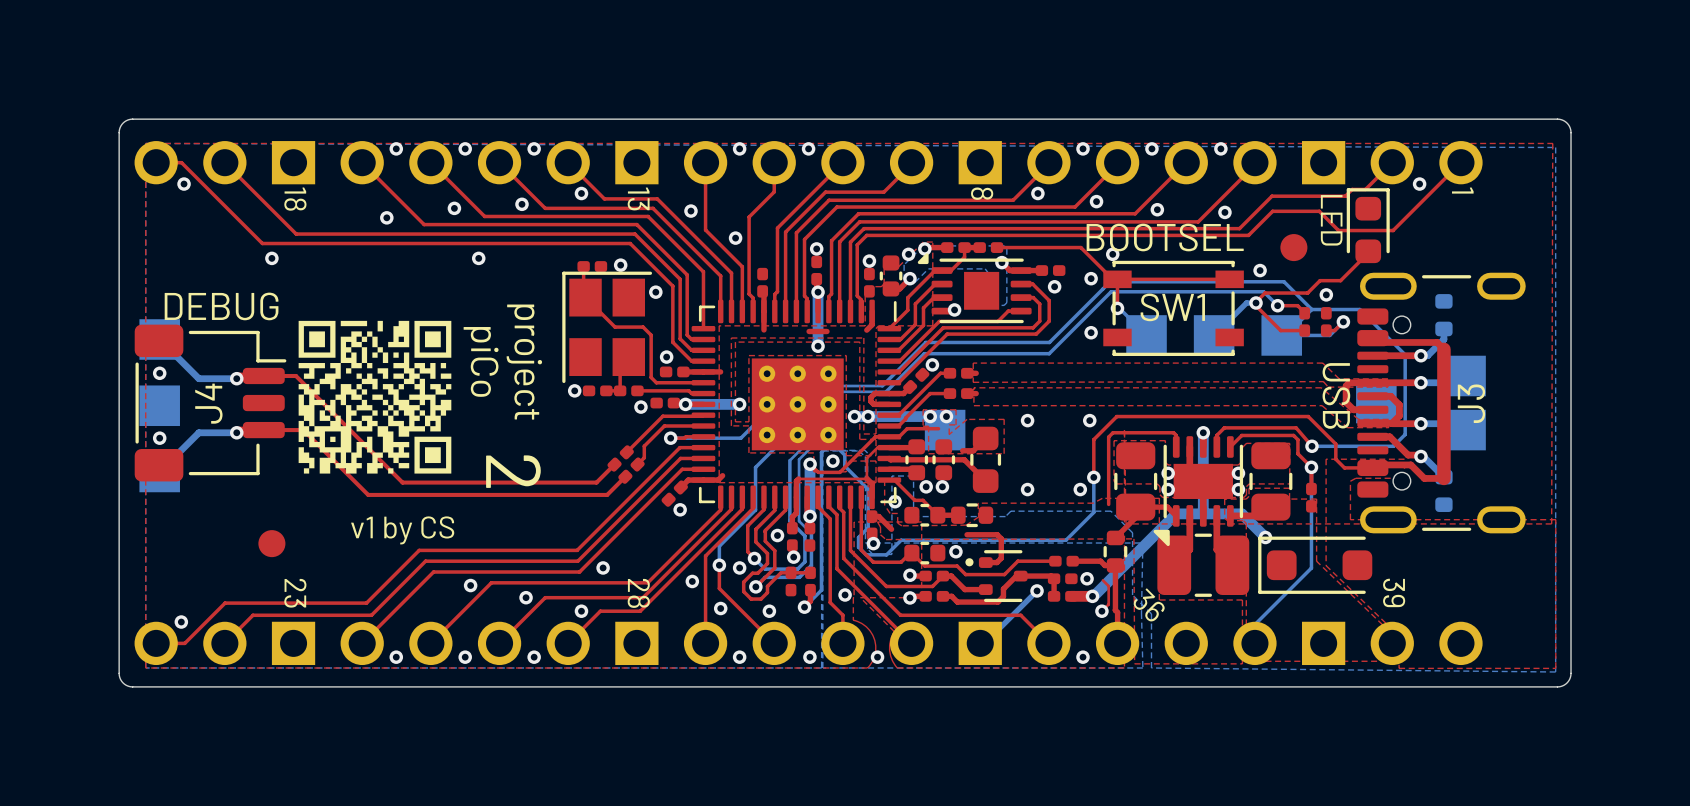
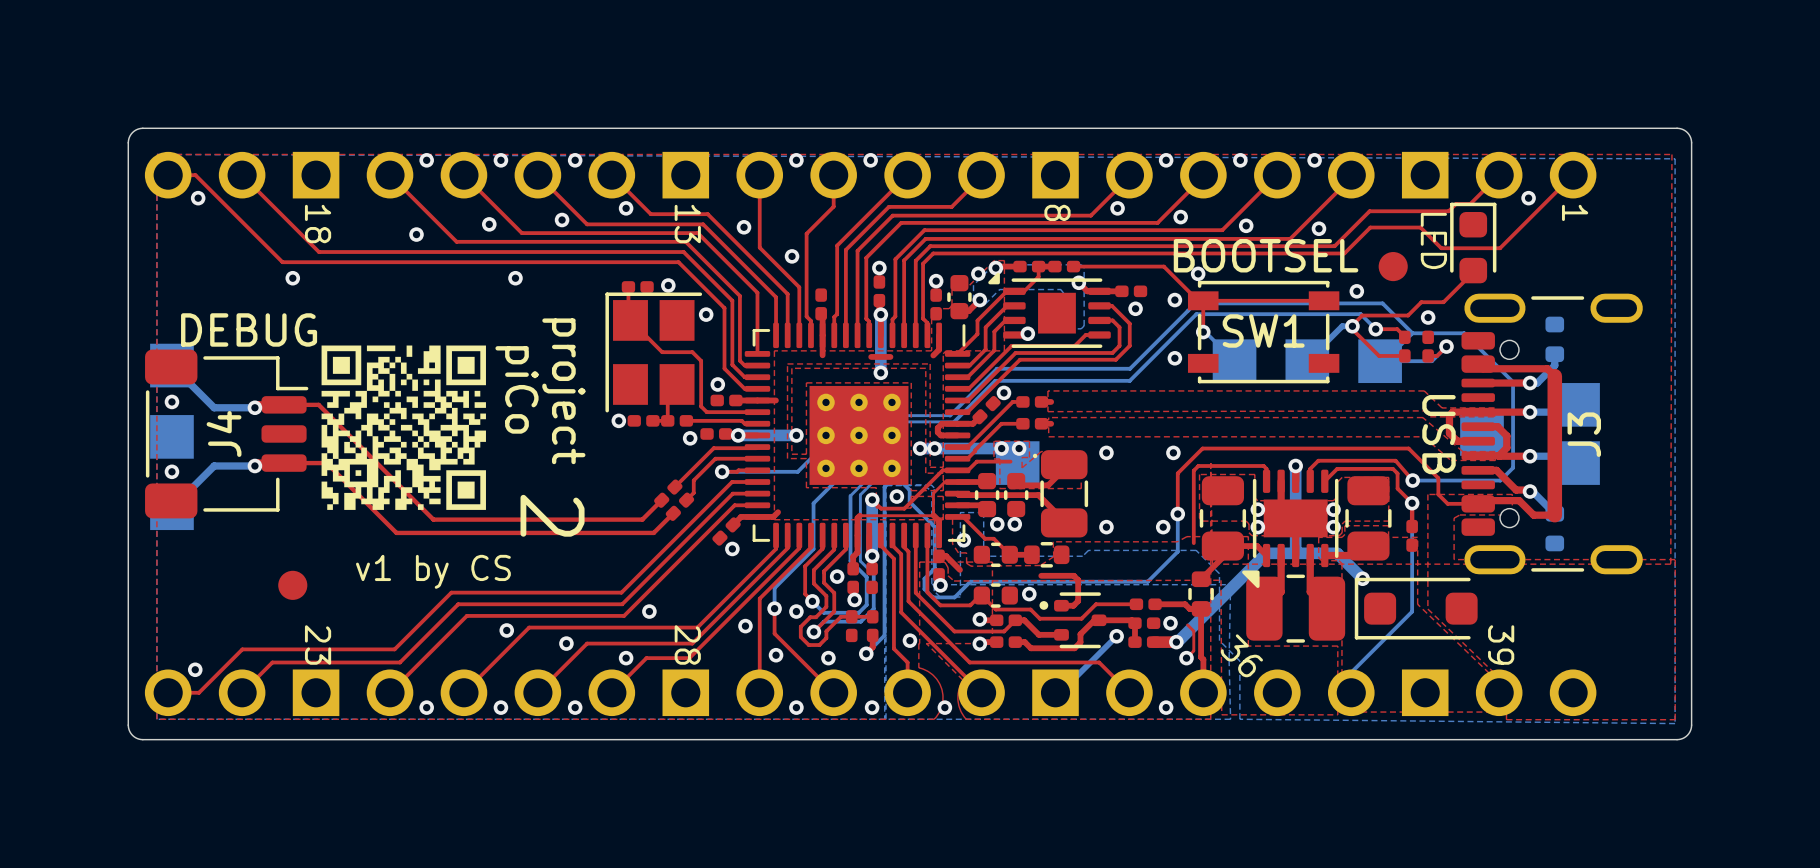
part footprint: [970, 426, 1002, 493] -> [1032, 450, 1089, 538]
top track: none -> (1017, 482) (1020, 485) (1036, 485)

